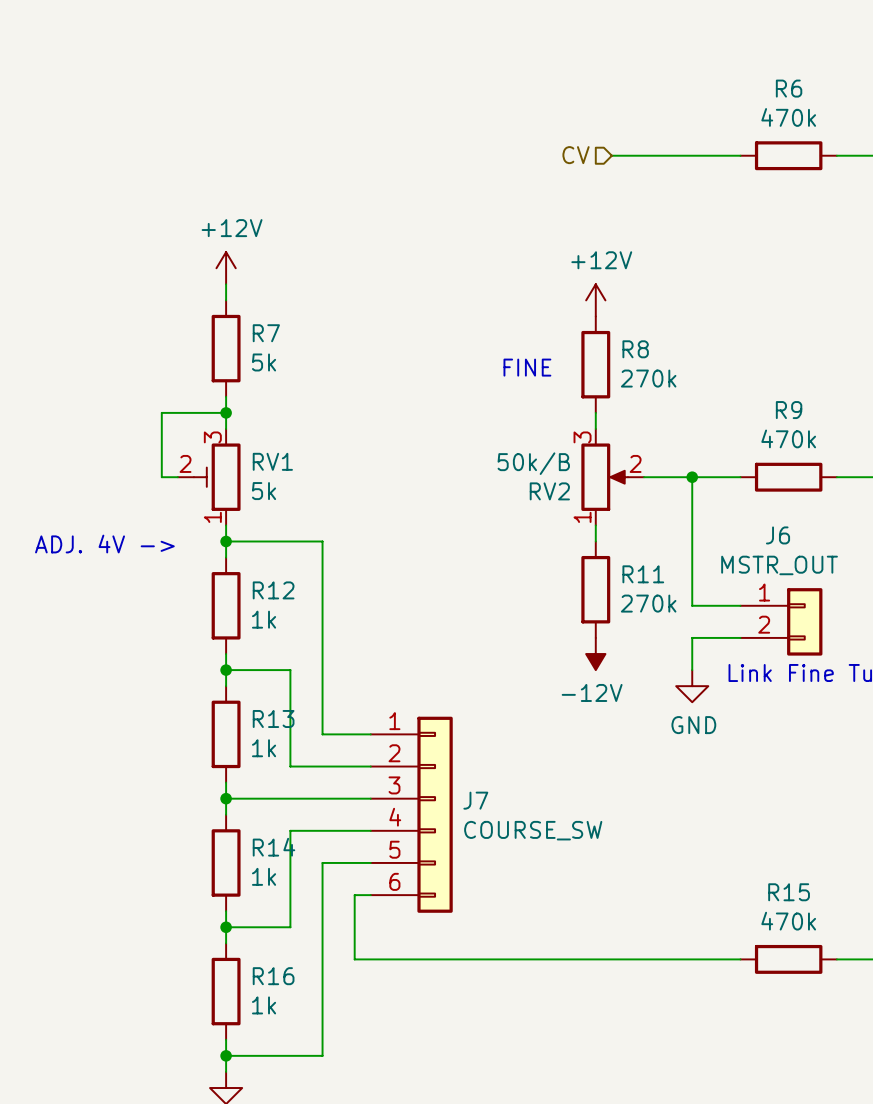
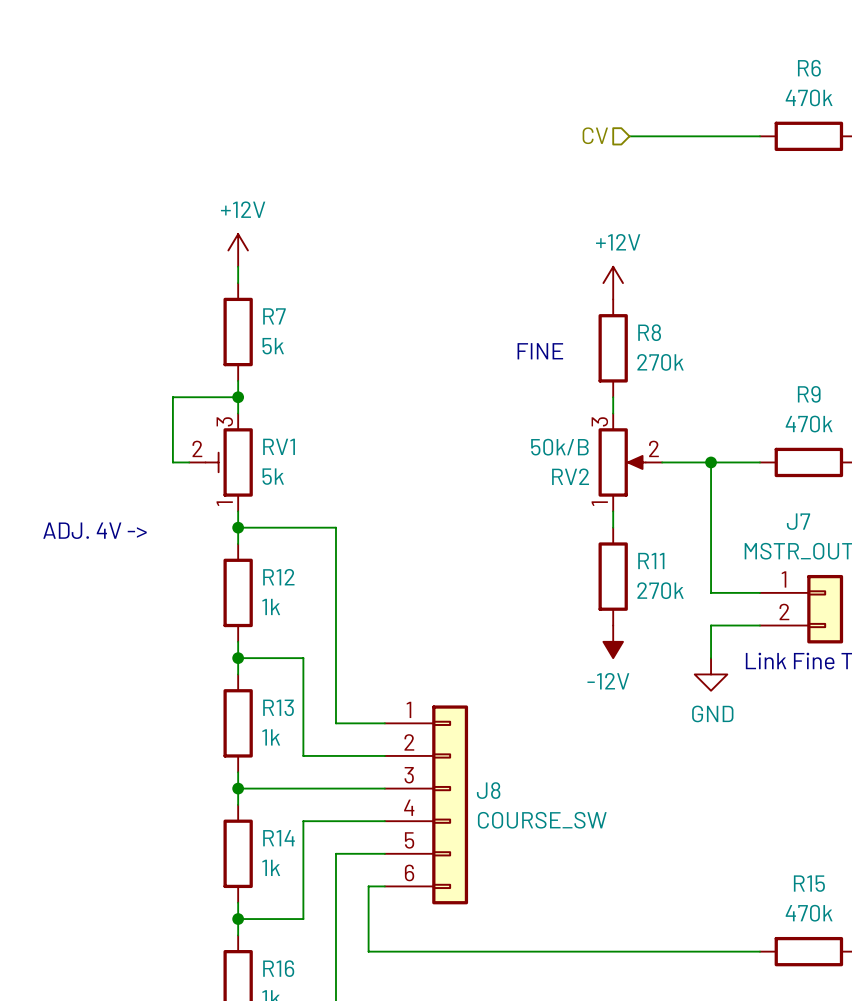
J6 name: J6 (778, 535) -> J7 (798, 521)
J7 name: J7 (475, 800) -> J8 (488, 790)

